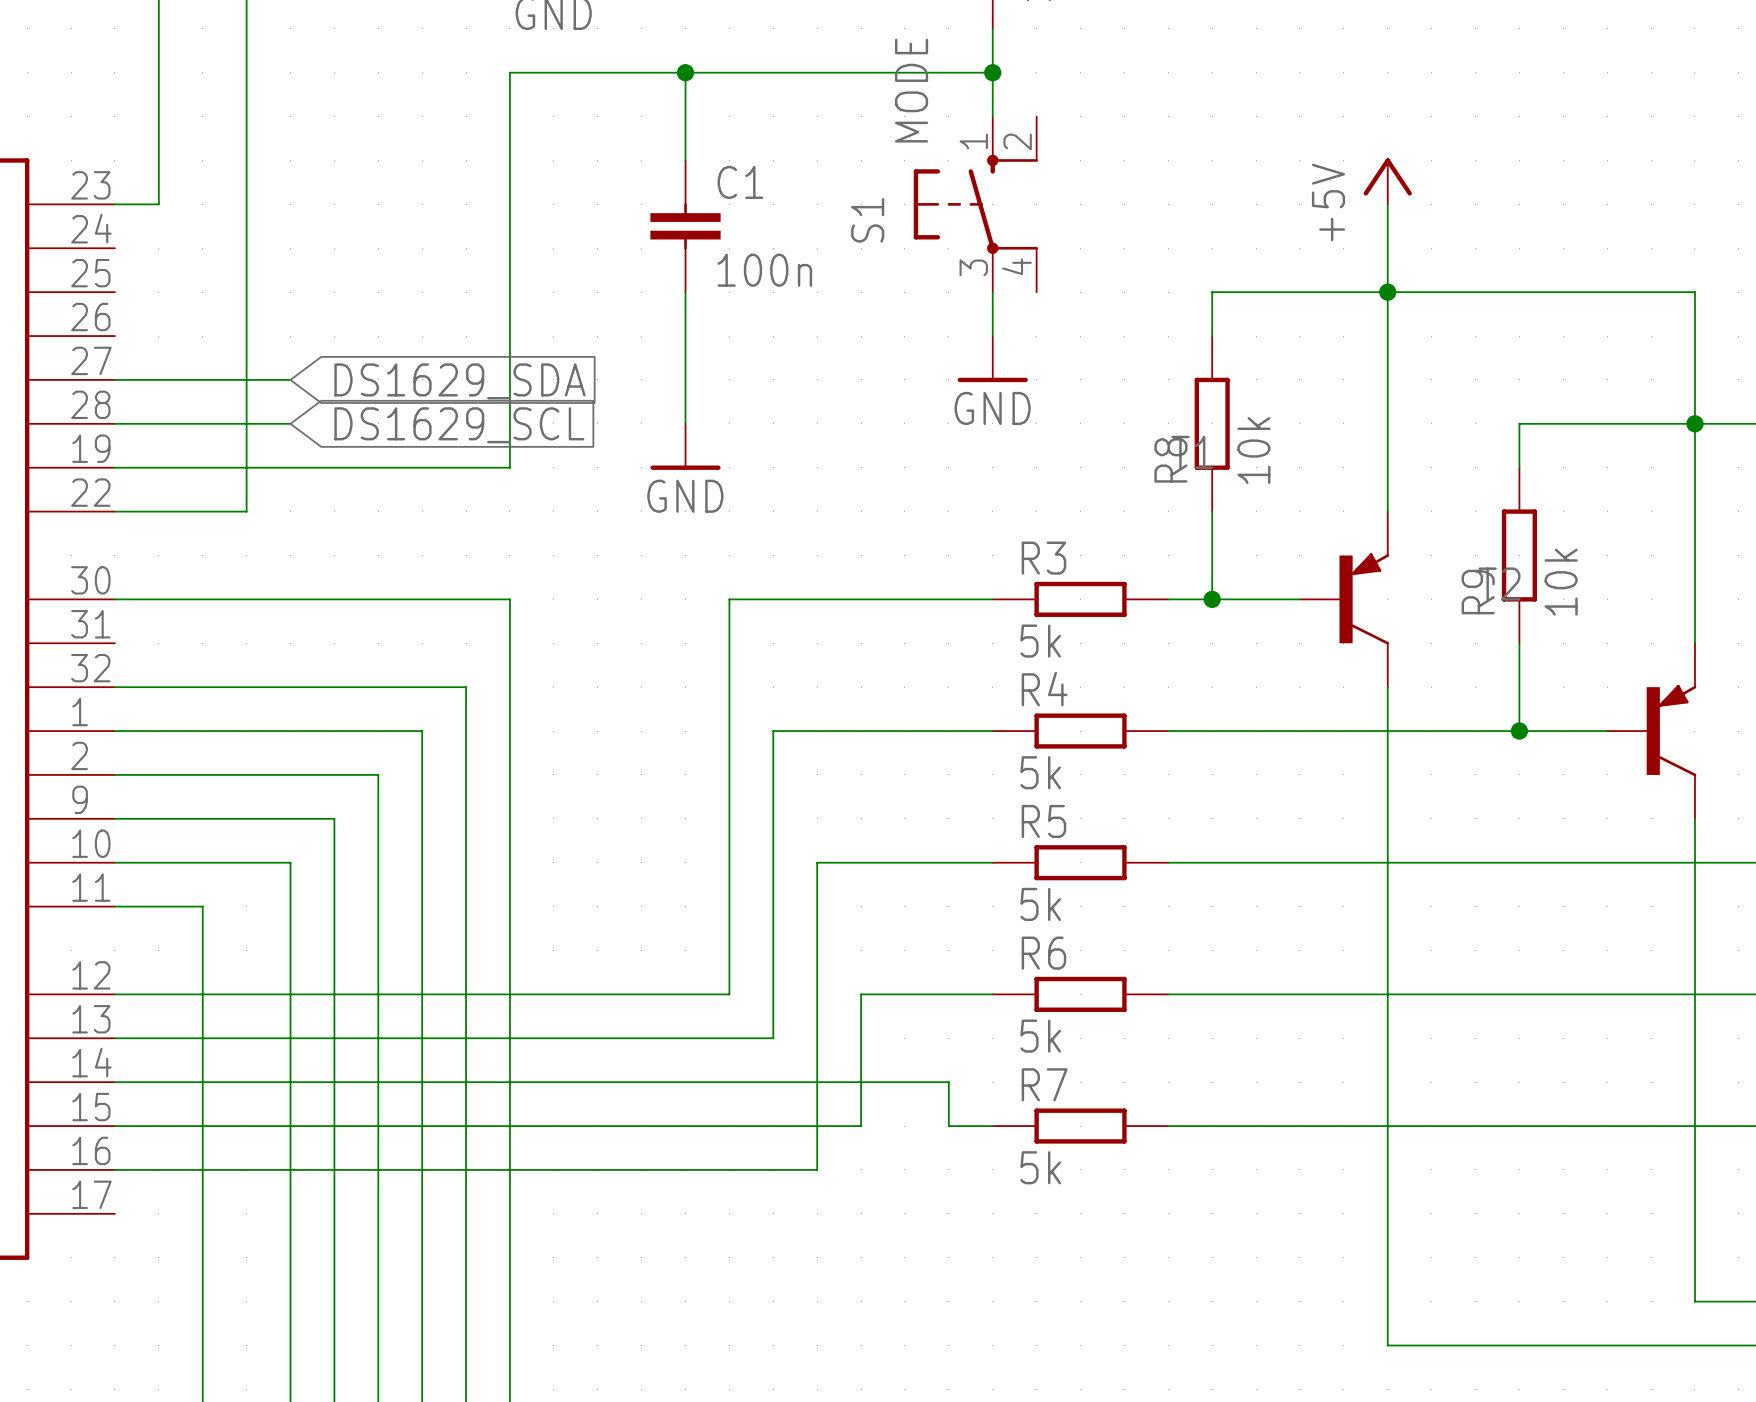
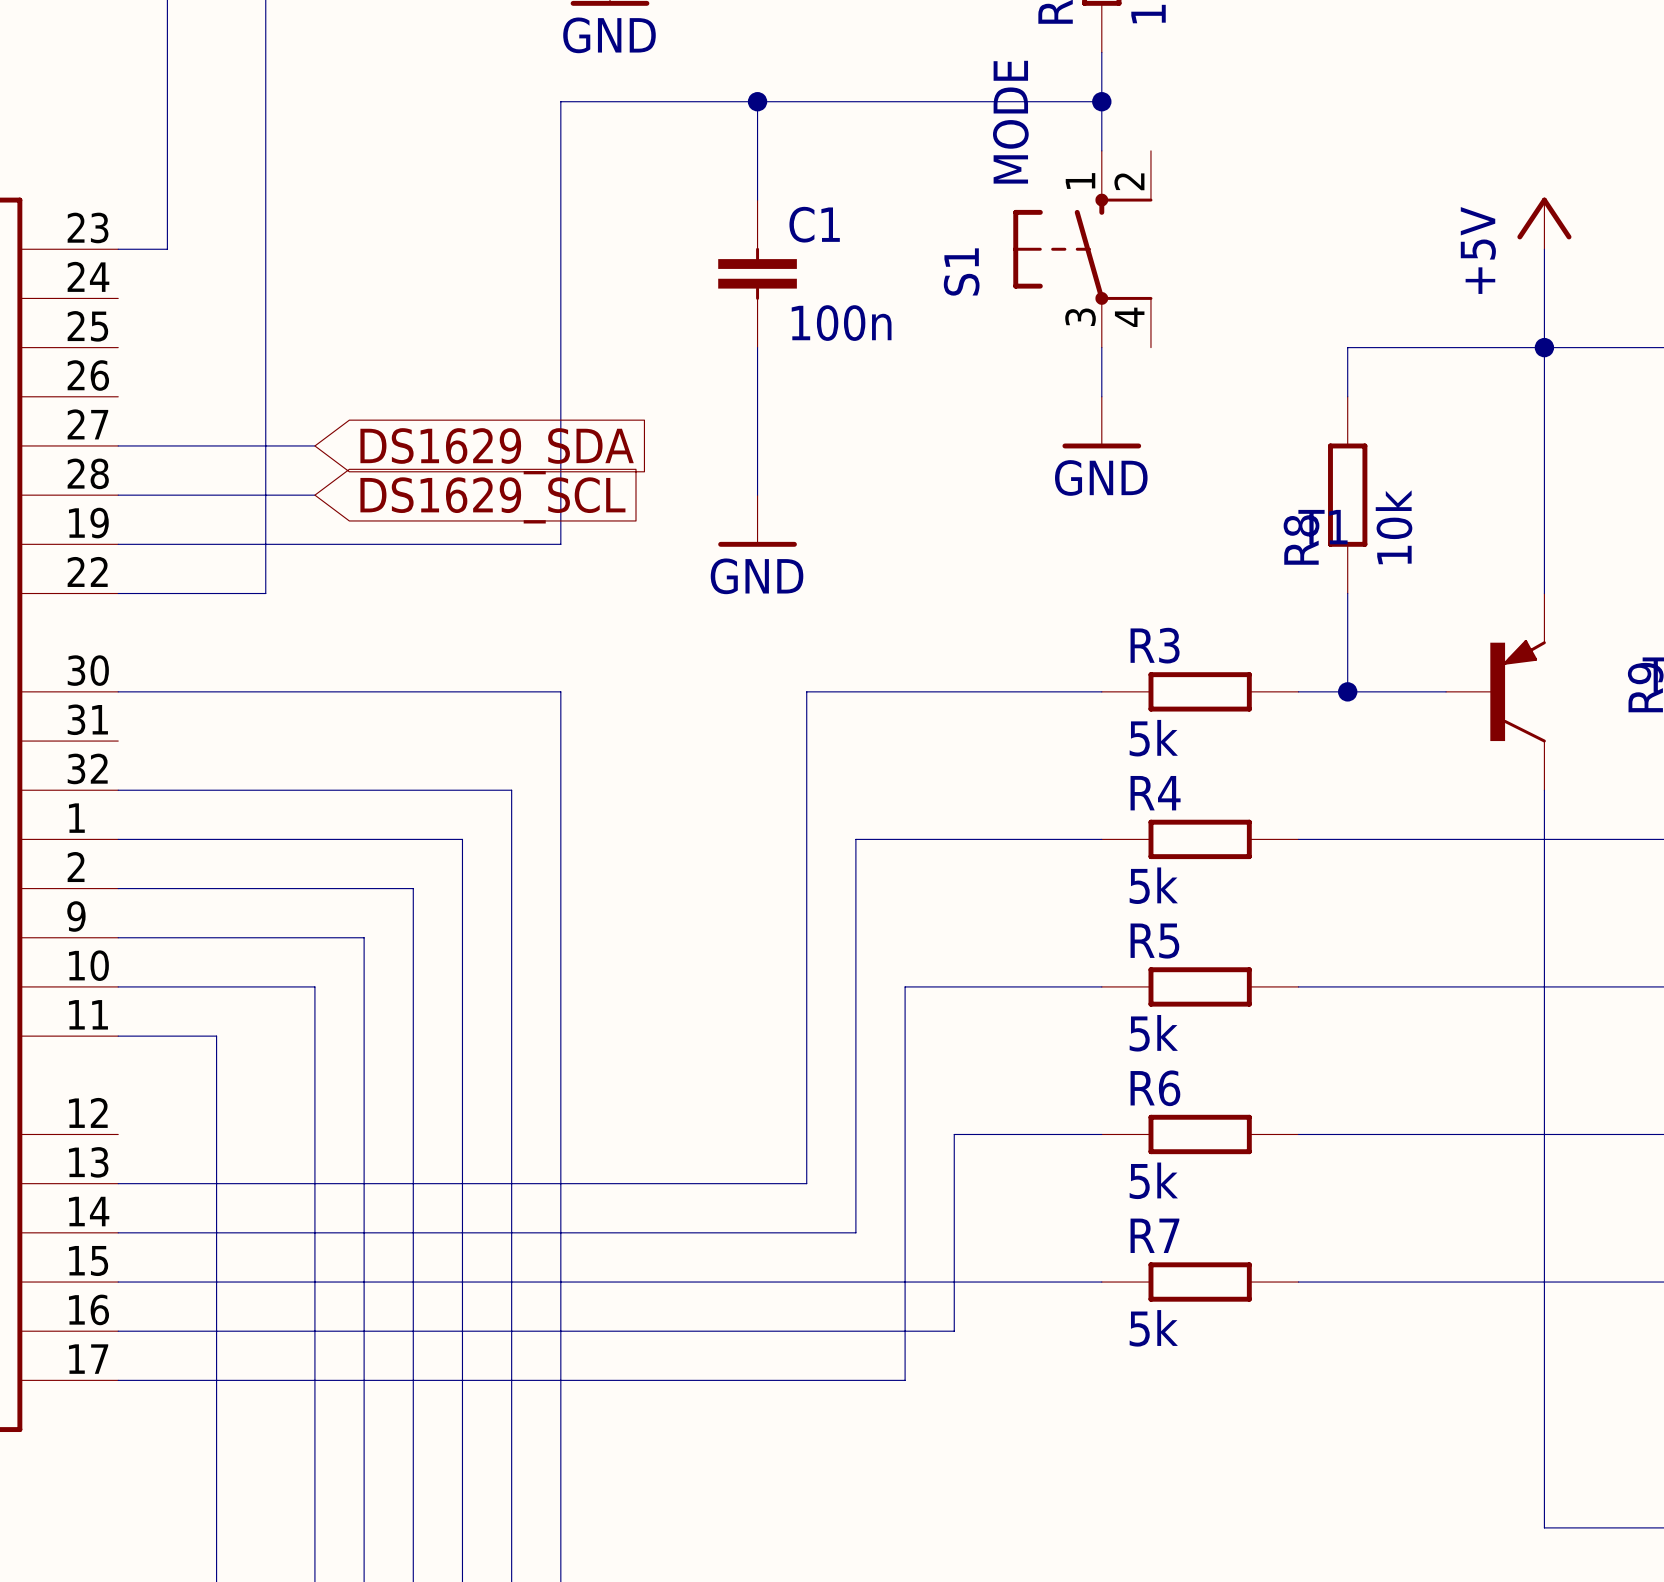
wire: (114, 994) (729, 994) -> none
wire: (729, 1038) (773, 1038) -> (806, 1183) (806, 1134)
wire: (773, 1082) (948, 1082) (948, 1126) -> (855, 1232) (855, 1183)
wire: none -> (1052, 1282) (954, 1282) (954, 1331) (905, 1331) (905, 1380) (118, 1380)

